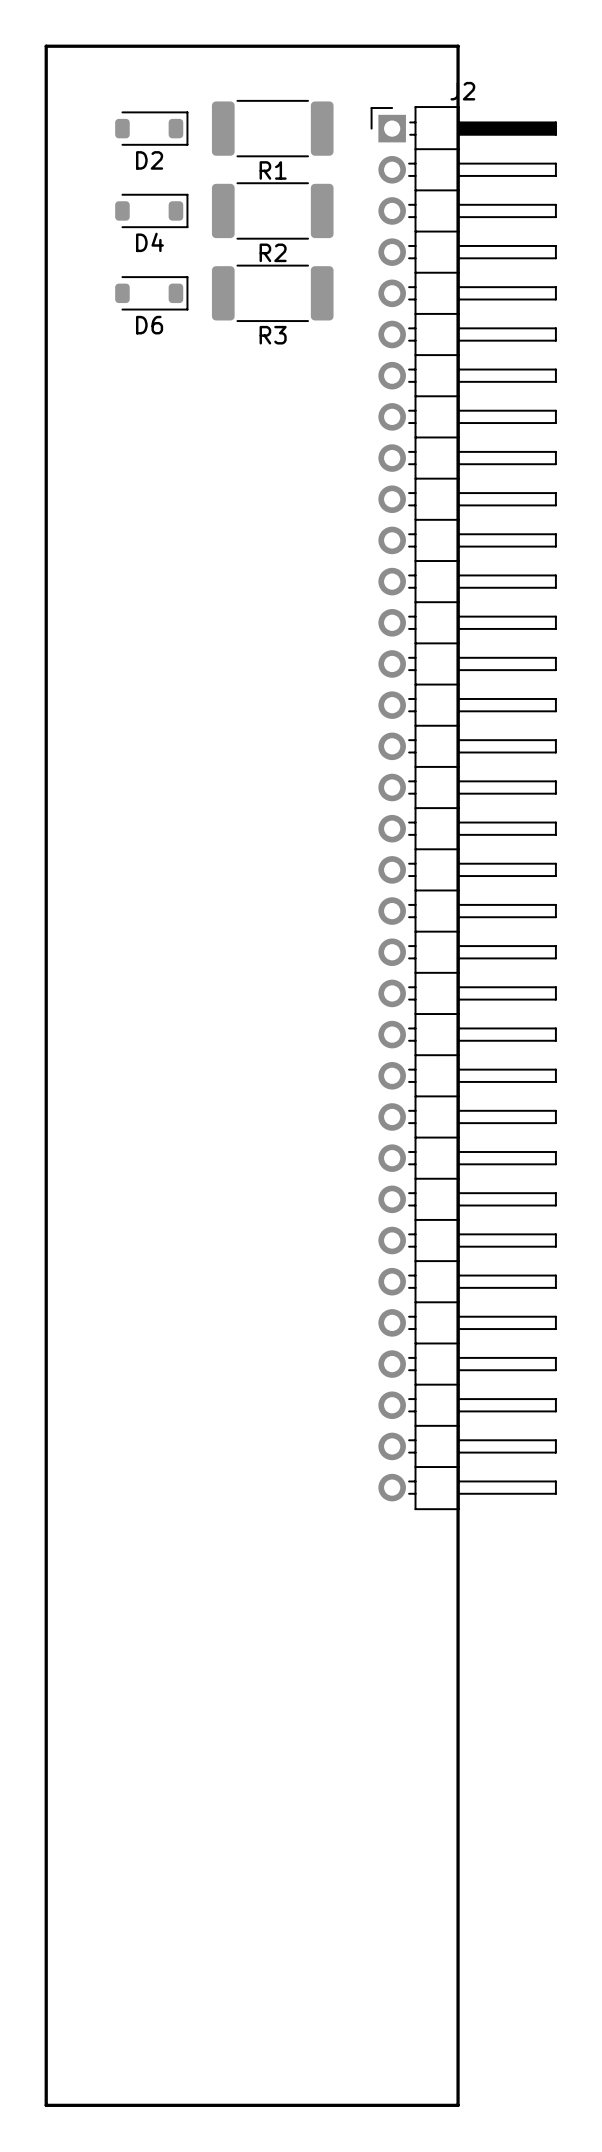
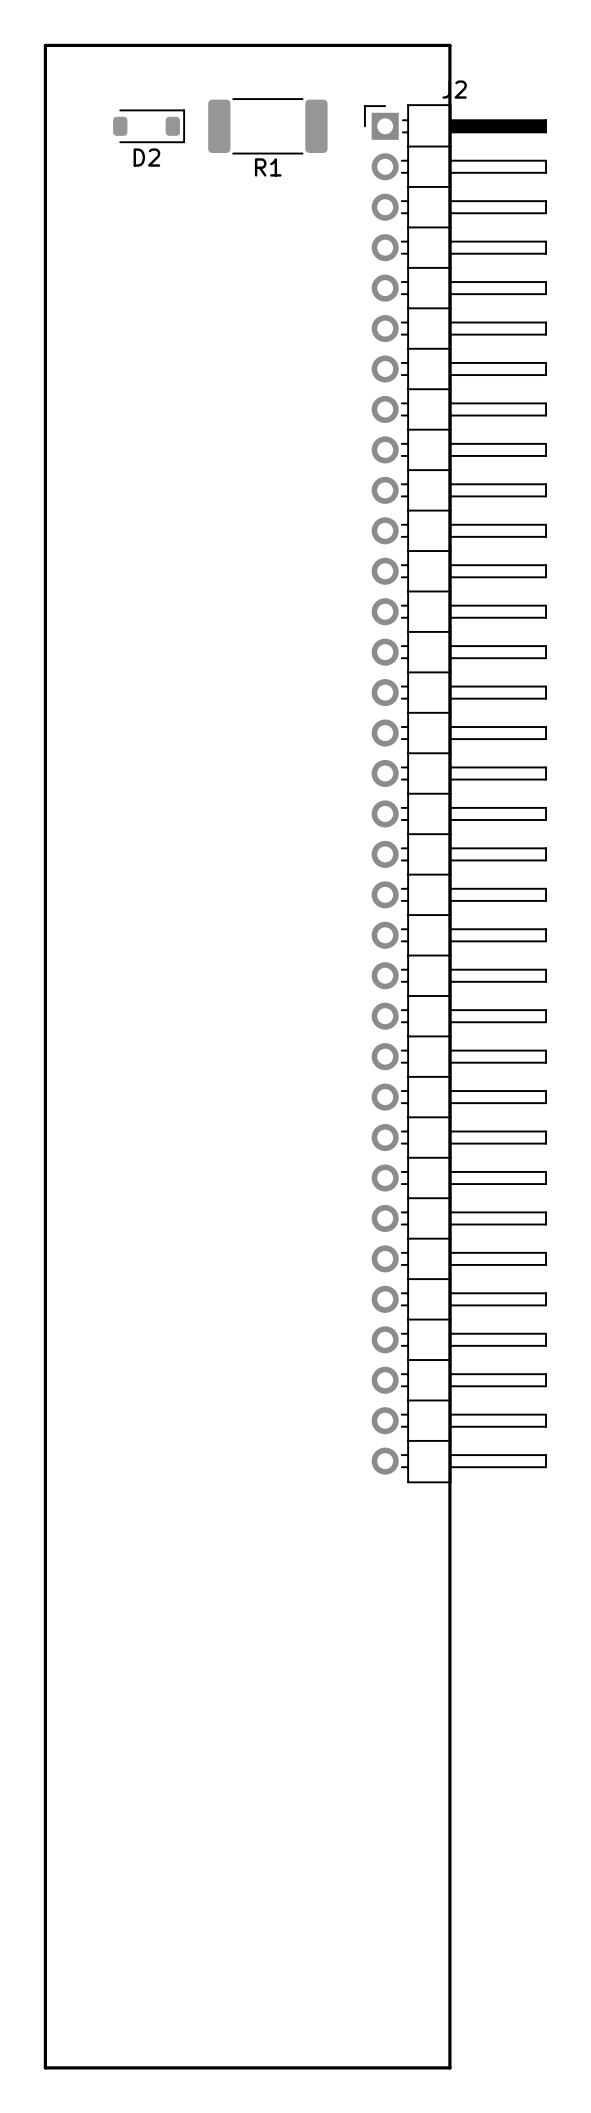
D4: (151, 210) -> none
R2: (272, 210) -> none
D6: (151, 293) -> none
R3: (272, 293) -> none

